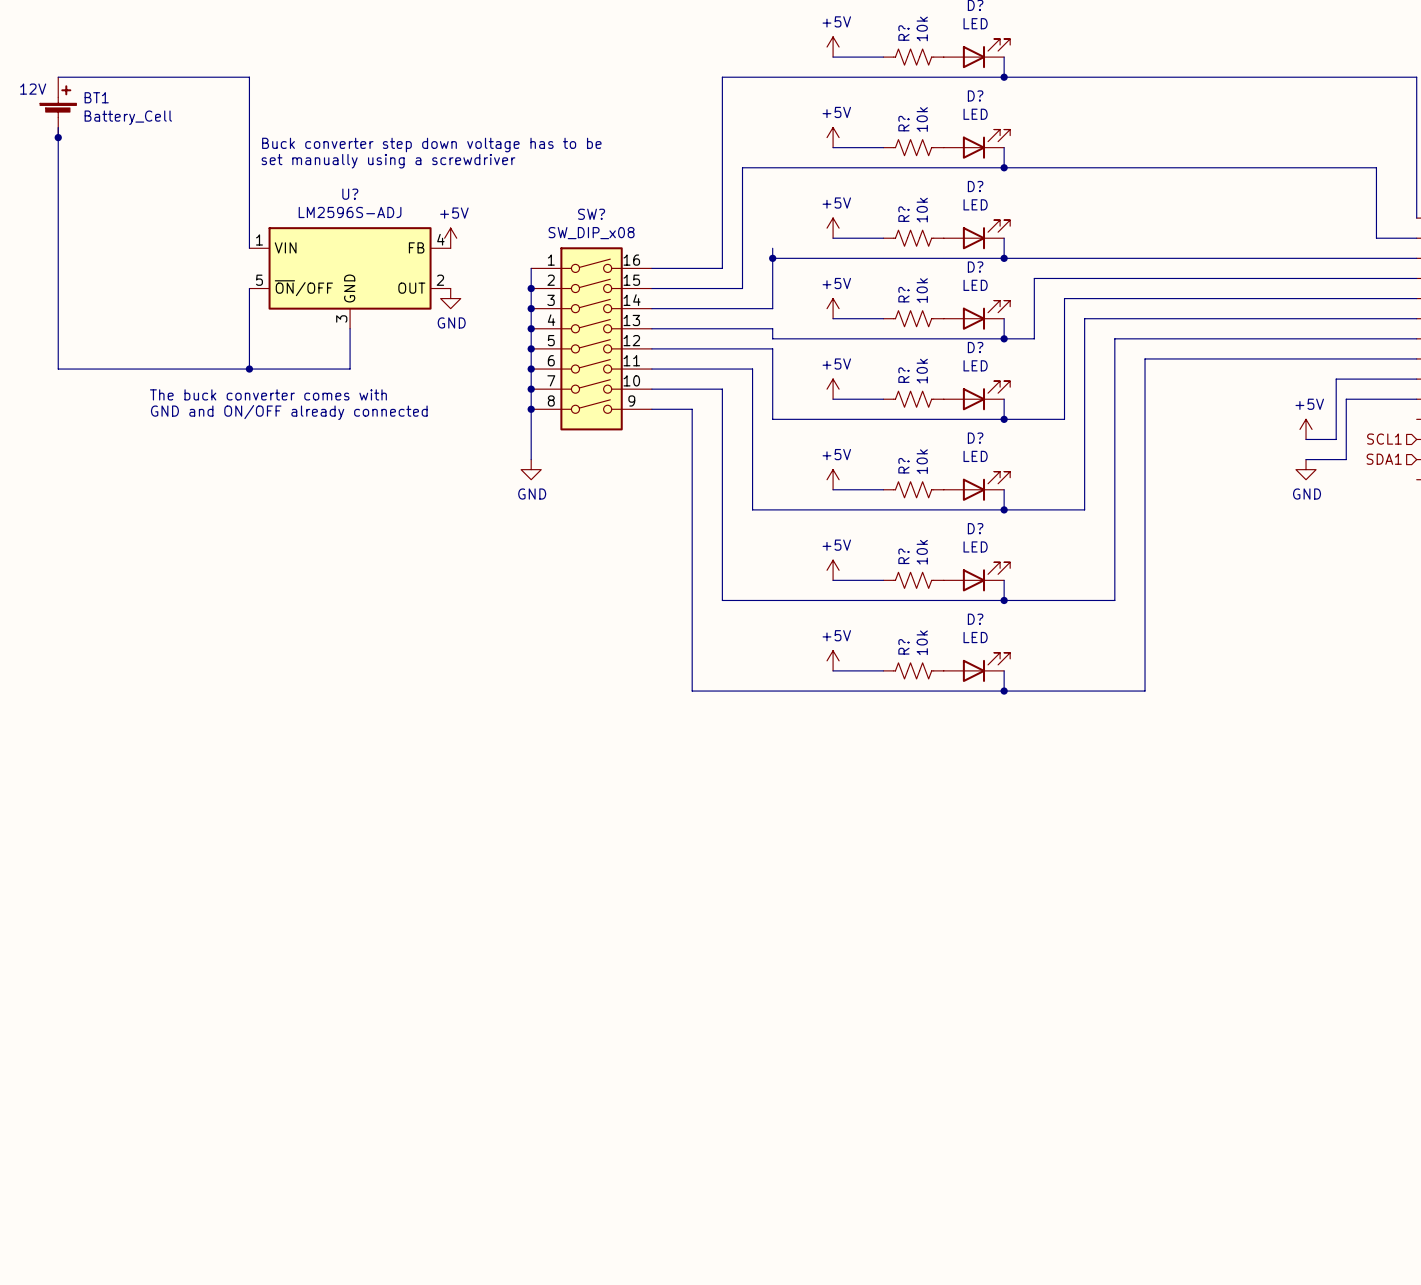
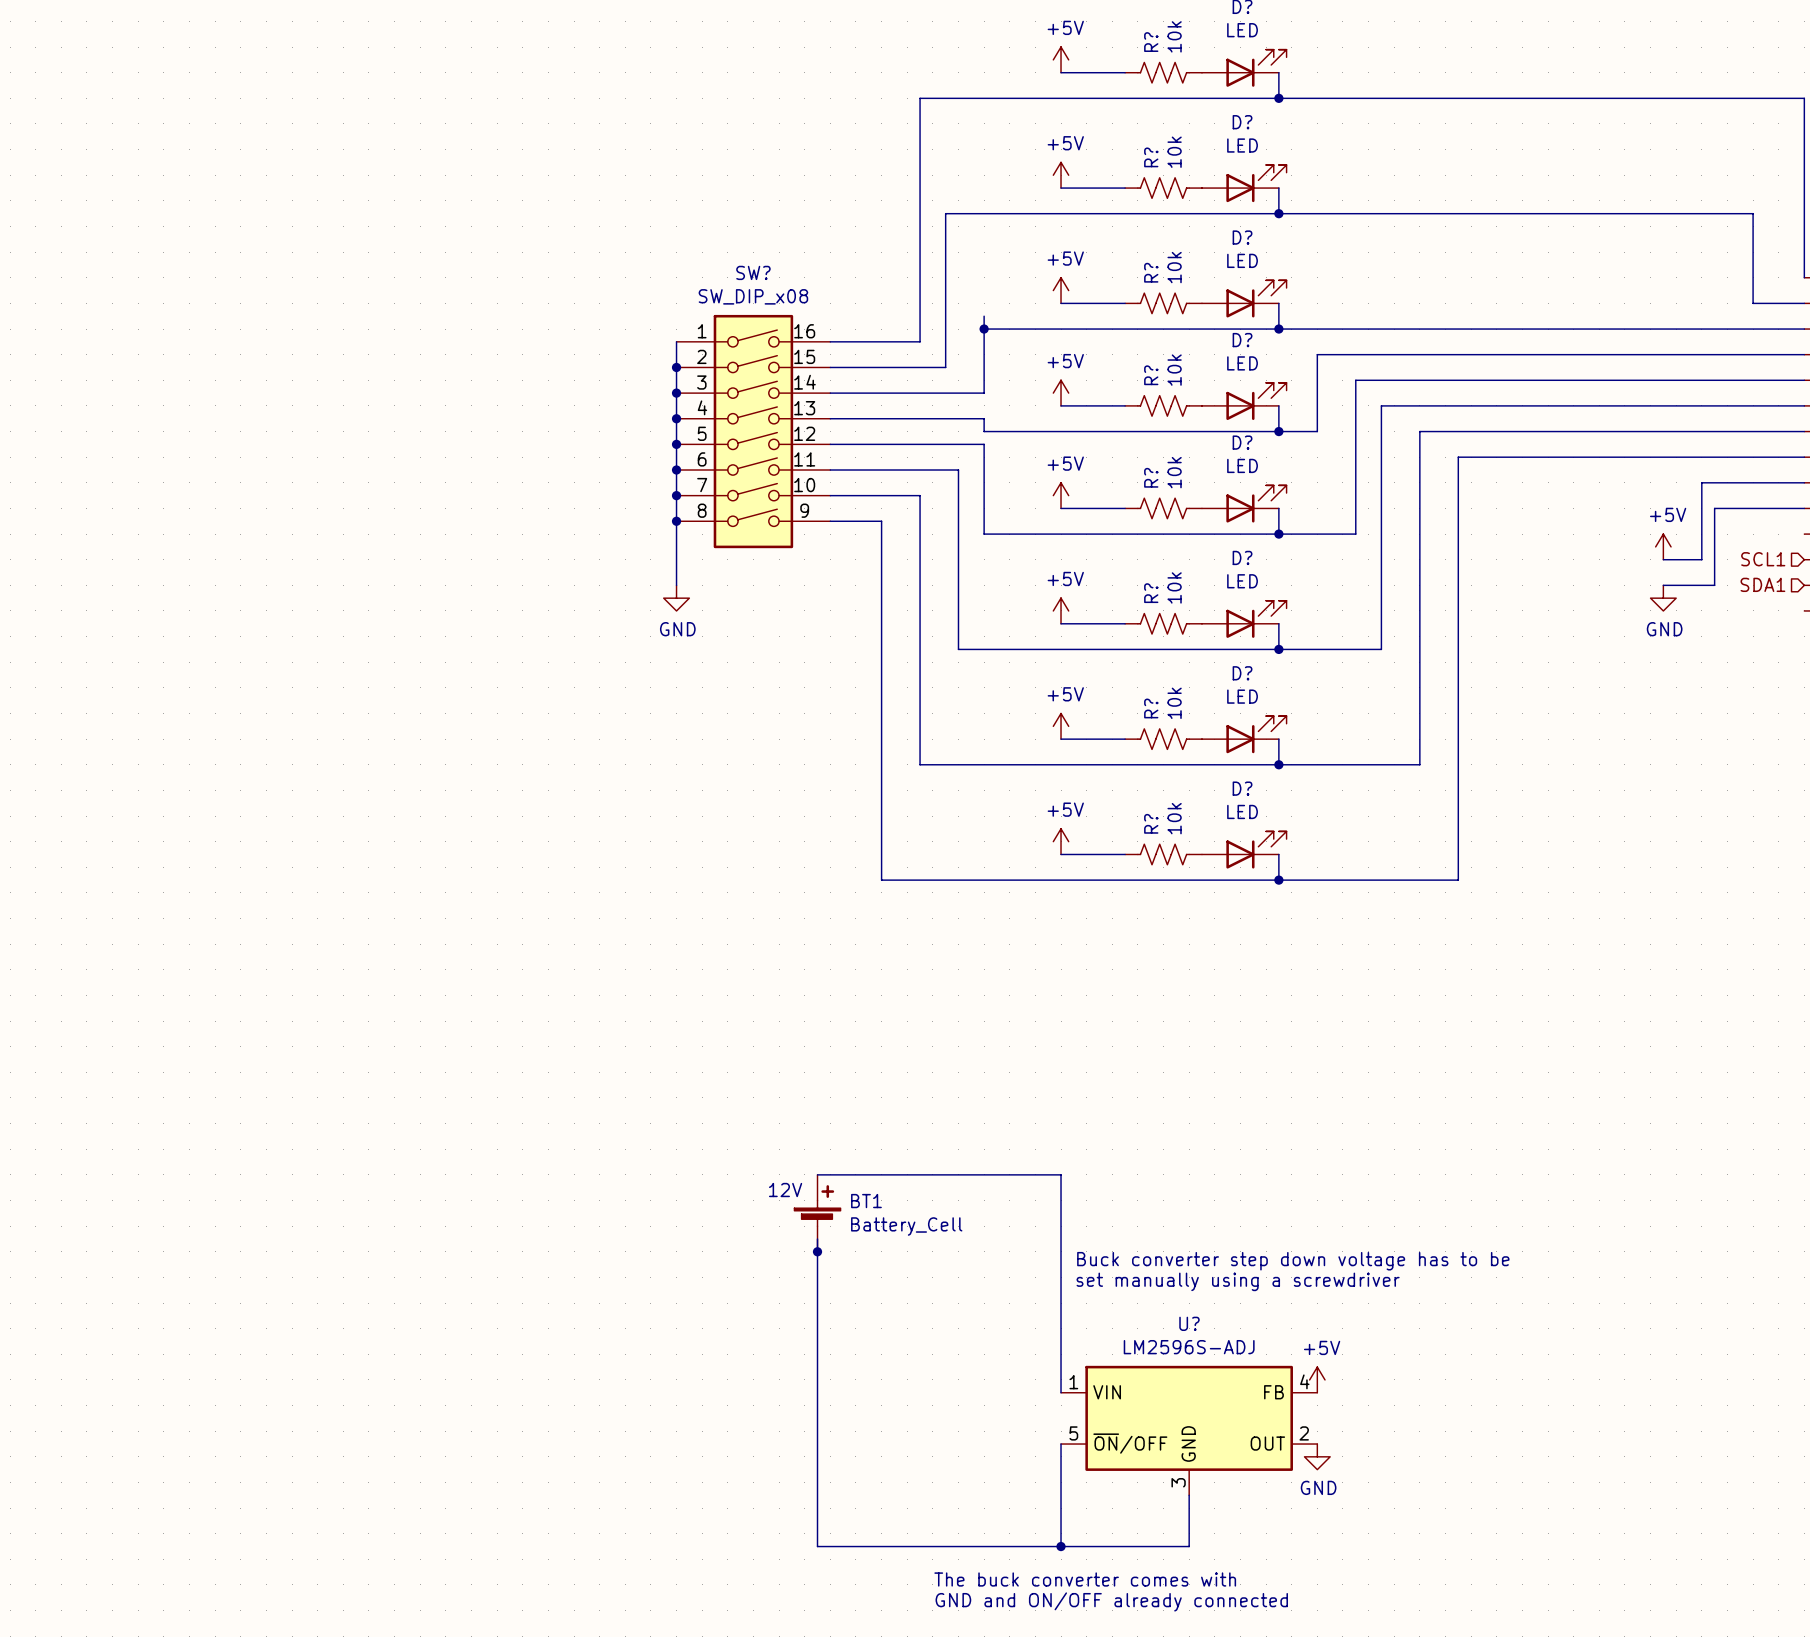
wire: (58, 77) (249, 77) (249, 248) -> none
text: 12V (33, 89) -> none
BT1 position: (58, 107) -> (817, 1213)
wire: (58, 127) (58, 369) (350, 369) (350, 328) -> none
junction: (58, 137) -> none
text: Buck converter step down voltage has to be (431, 145) -> none
text: set manually using a screwdriver (388, 161) -> none
power symbol: +5V (450, 238) -> none
U?: LM2596S-ADJ (350, 277) -> none
wire: (249, 288) (249, 369) -> none
power symbol: GND (450, 298) -> none
junction: (249, 369) -> none
text: The buck converter comes with (268, 394) -> none
text: GND and ON/OFF already connected (289, 412) -> none
wire: none -> (817, 1174) (1061, 1174) (1061, 1392)
text: none -> 12V (785, 1190)
wire: none -> (817, 1238) (817, 1546) (1189, 1546) (1189, 1495)
junction: none -> (817, 1251)
text: none -> Buck converter step down voltage has to be (1293, 1261)
text: none -> set manually using a screwdriver (1238, 1281)
power symbol: none -> +5V (1317, 1379)
U?: none -> LM2596S-ADJ (1189, 1430)
wire: none -> (1061, 1444) (1061, 1546)
power symbol: none -> GND (1317, 1456)
junction: none -> (1061, 1546)
text: none -> The buck converter comes with (1085, 1579)
text: none -> GND and ON/OFF already connected (1111, 1601)

